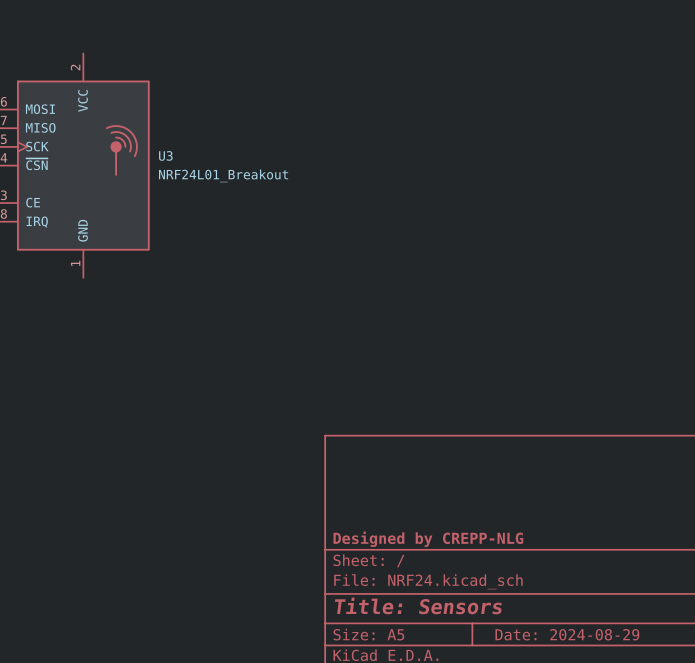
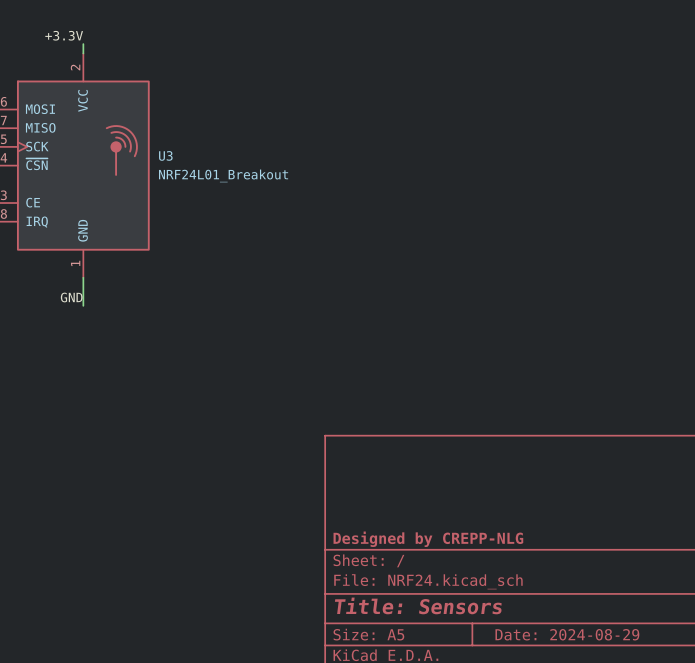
label: none -> +3.3V (64, 35)
wire: none -> (83, 44) (83, 53)
wire: none -> (83, 277) (83, 305)
label: none -> GND (71, 297)

